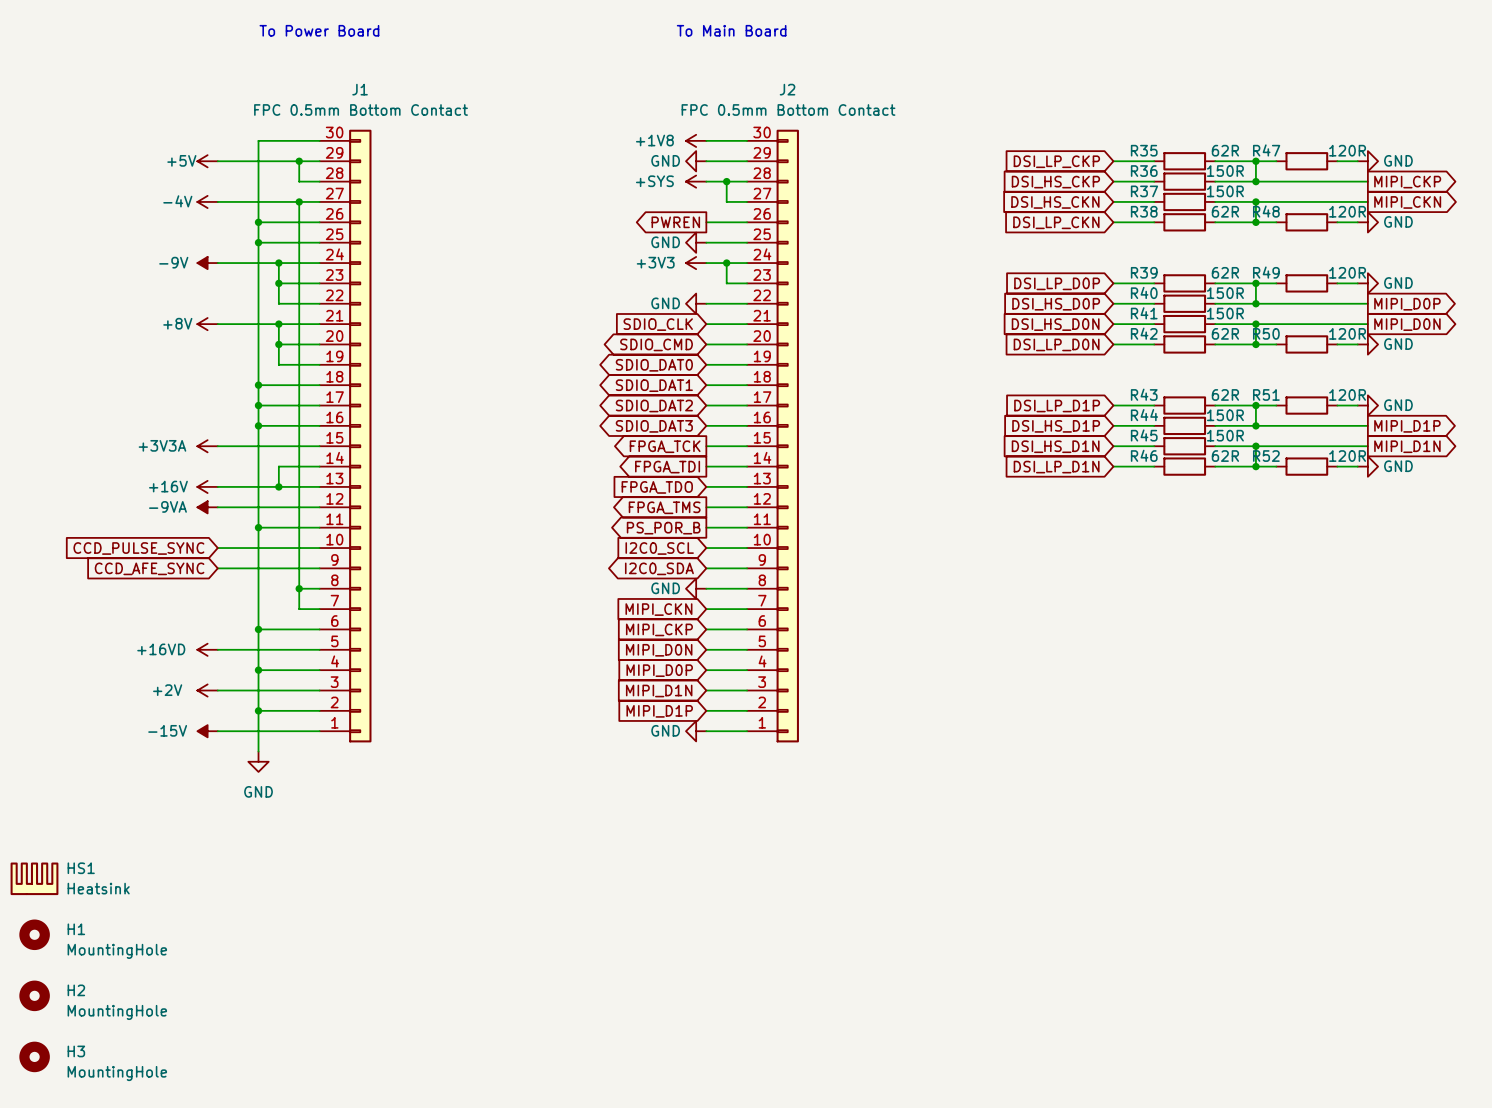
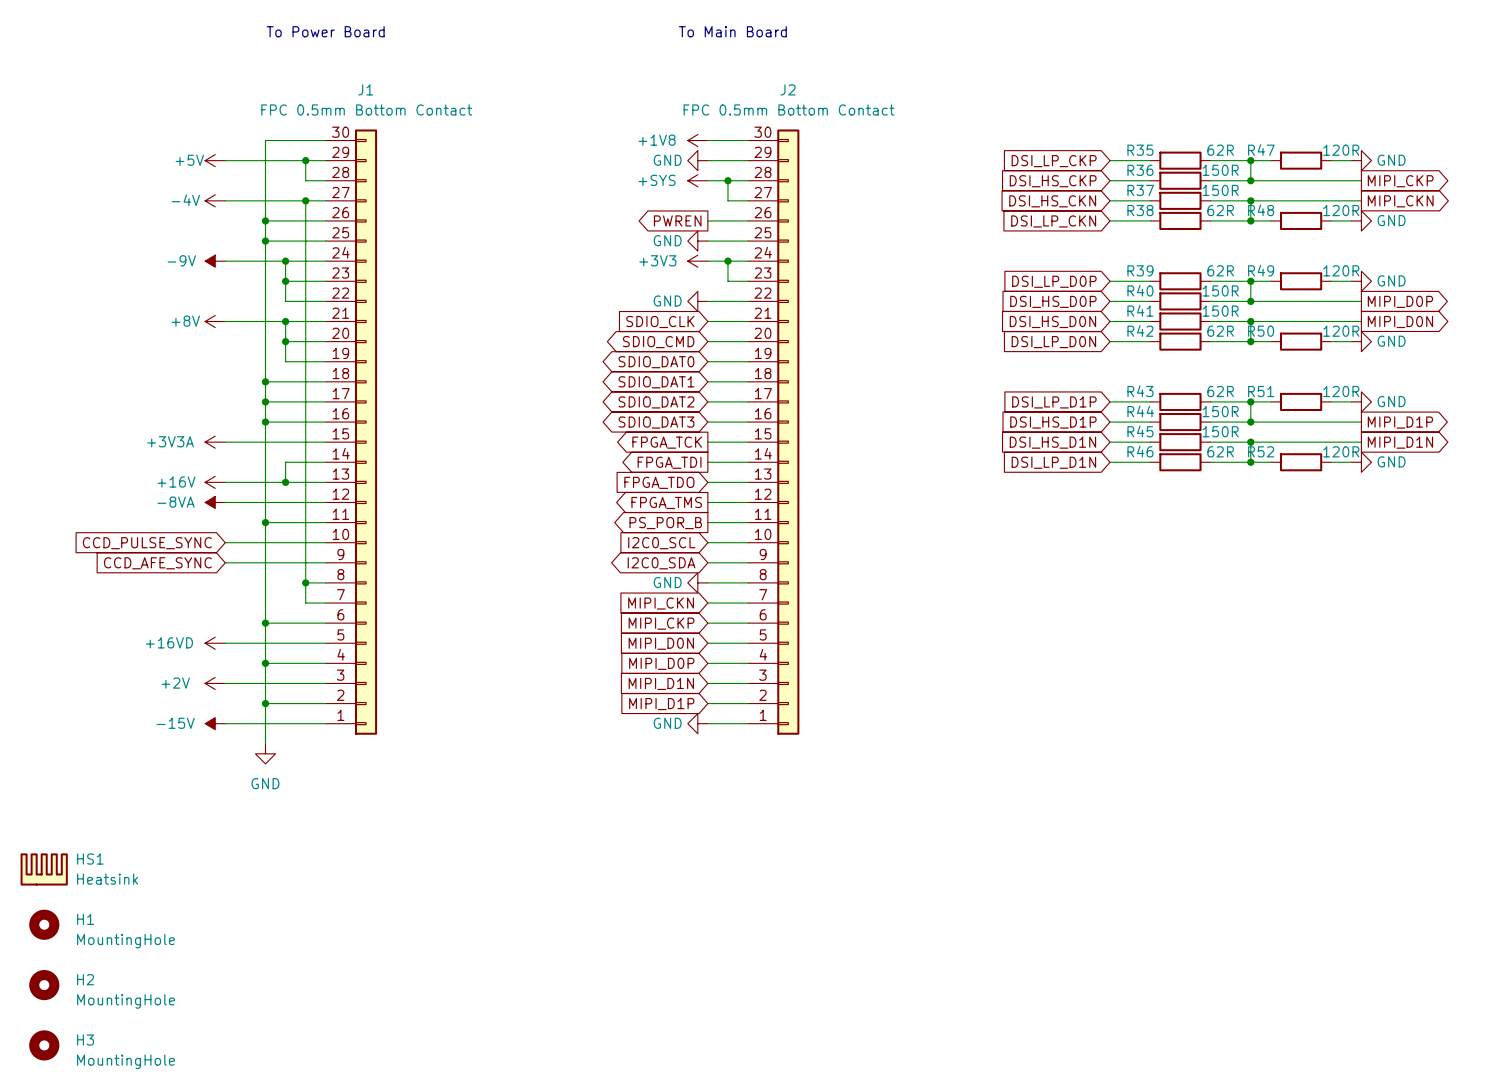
power symbol: -9VA (207, 507) -> -8VA (215, 502)

